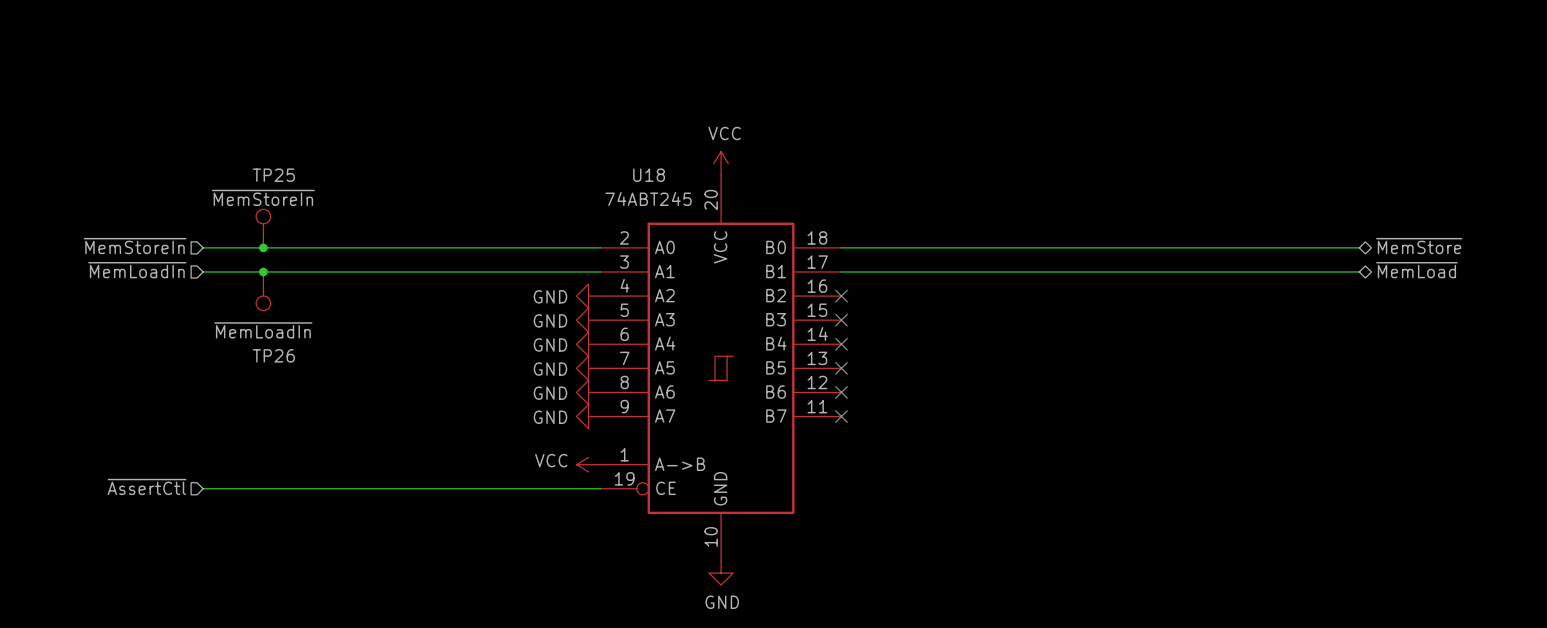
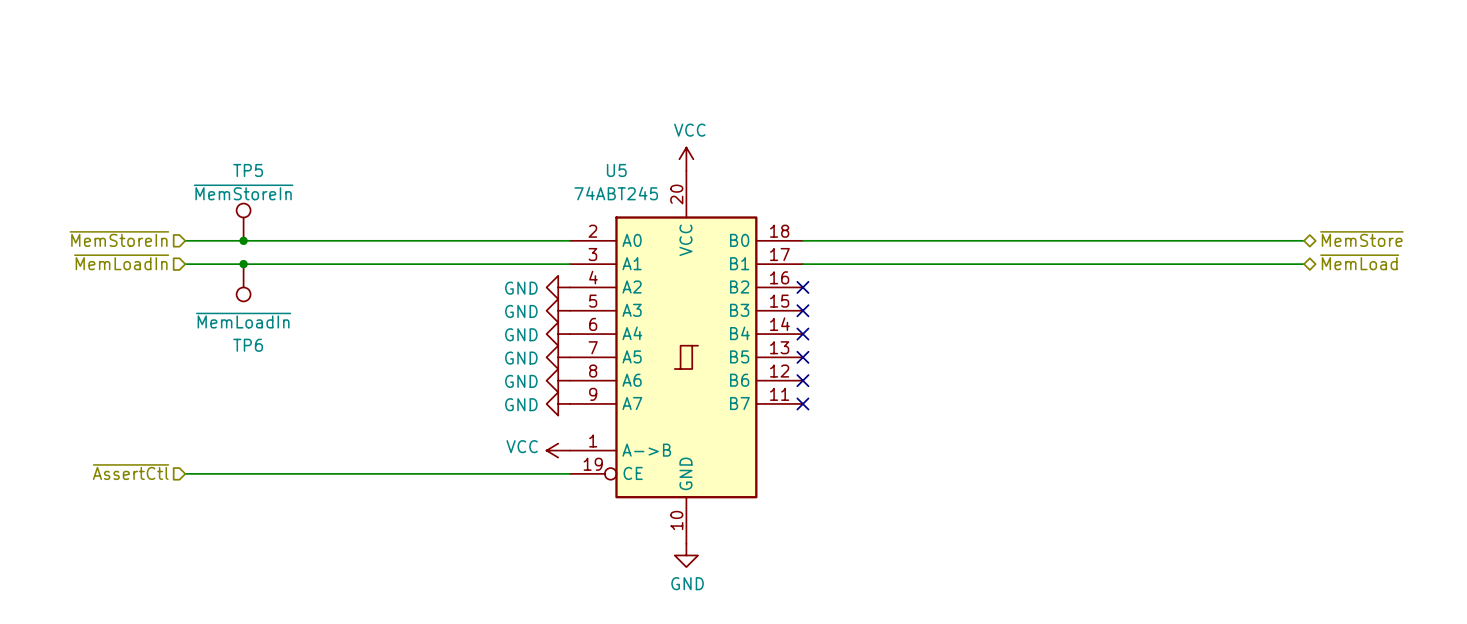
TP25 name: TP25 (273, 175) -> TP5 (248, 170)
U18 name: U18 (649, 175) -> U5 (616, 170)
TP26 name: TP26 (273, 355) -> TP6 (248, 345)

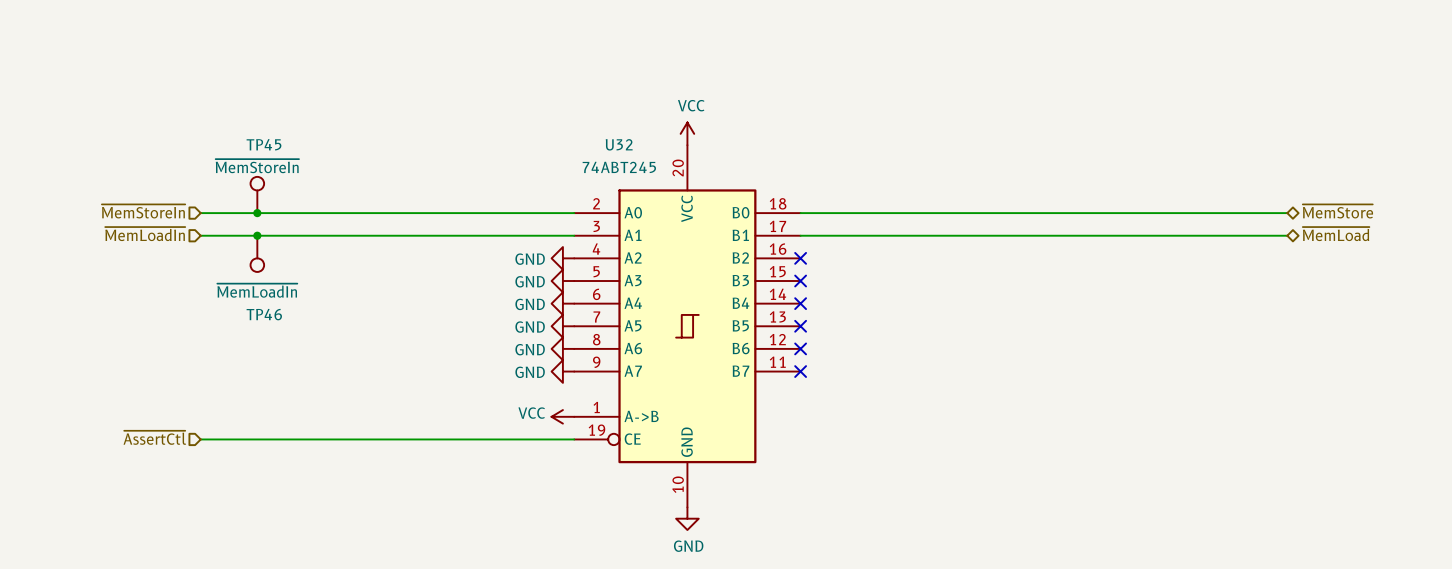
TP5 name: TP5 (248, 170) -> TP45 (263, 144)
U5 name: U5 (616, 170) -> U32 (619, 144)
TP6 name: TP6 (248, 345) -> TP46 (264, 314)

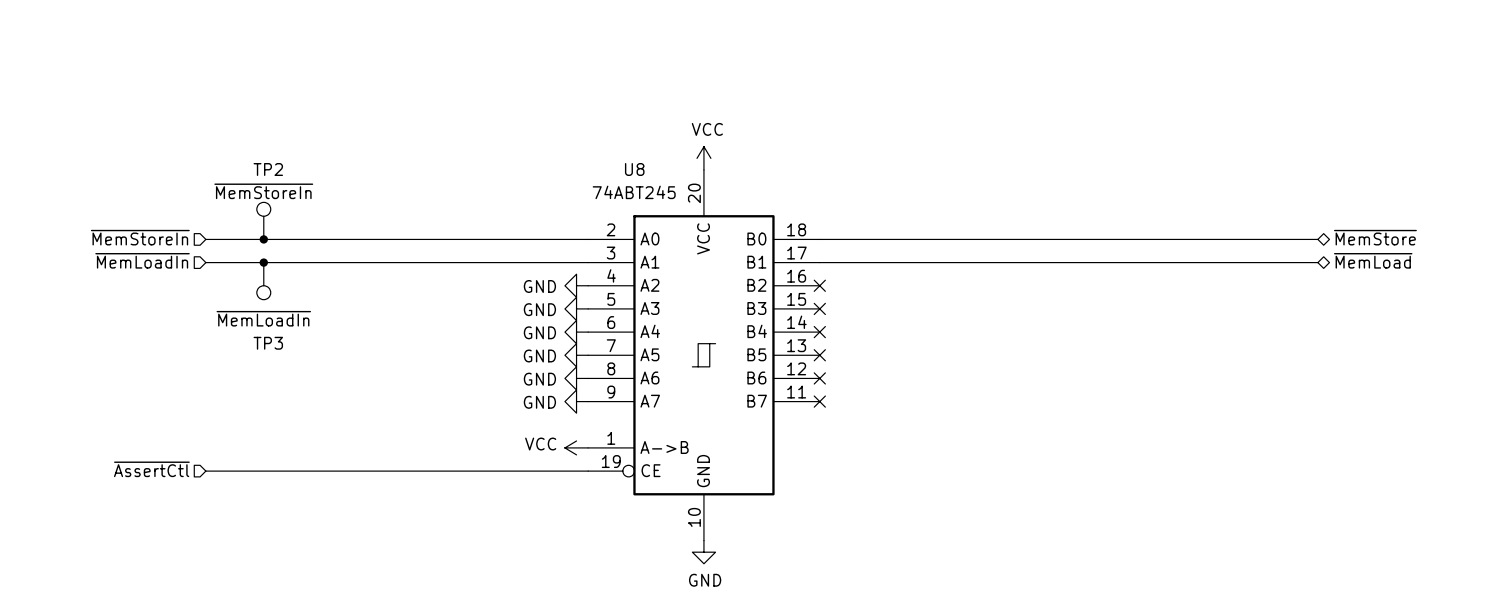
TP45 name: TP45 (263, 144) -> TP2 (268, 169)
U32 name: U32 (619, 144) -> U8 (634, 169)
TP46 name: TP46 (264, 314) -> TP3 (268, 343)

